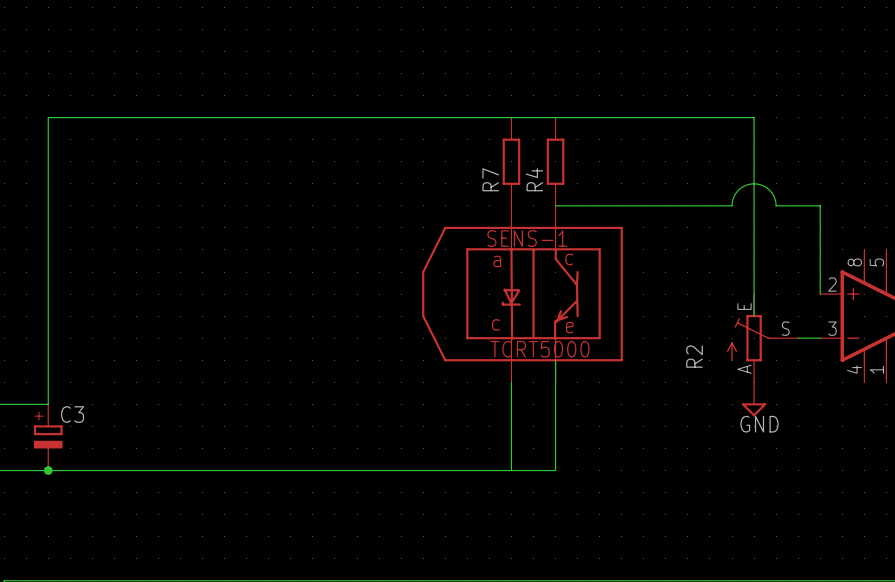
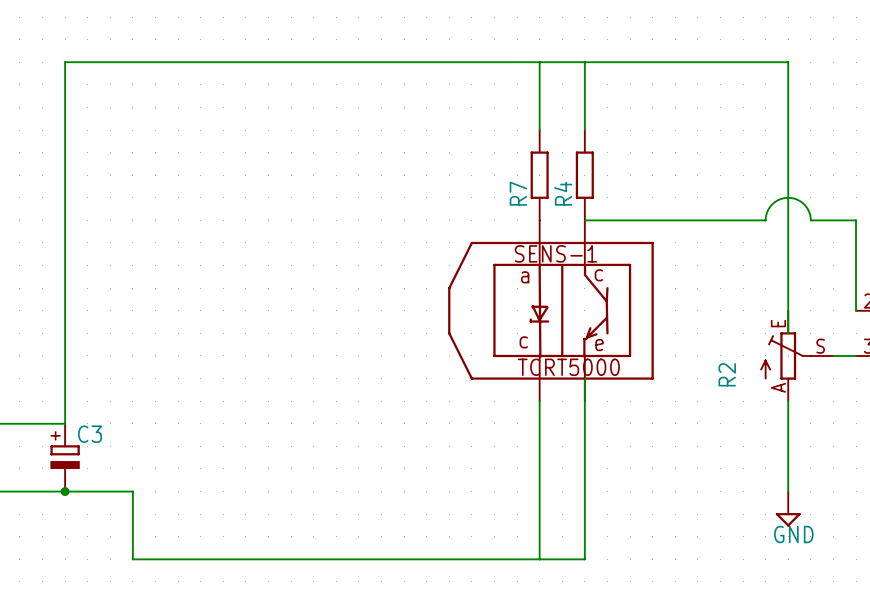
wire: none -> (539, 62) (539, 130)
wire: none -> (584, 62) (584, 130)
wire: (48, 117) (754, 117) -> (65, 130) (65, 62) (788, 62) (788, 130)
wire: none -> (788, 401) (788, 491)
power symbol position: GND (754, 399) -> GND (788, 509)
wire: (114, 470) (555, 470) -> (132, 491) (132, 559) (584, 559) (584, 491)
wire: none -> (539, 491) (539, 559)

